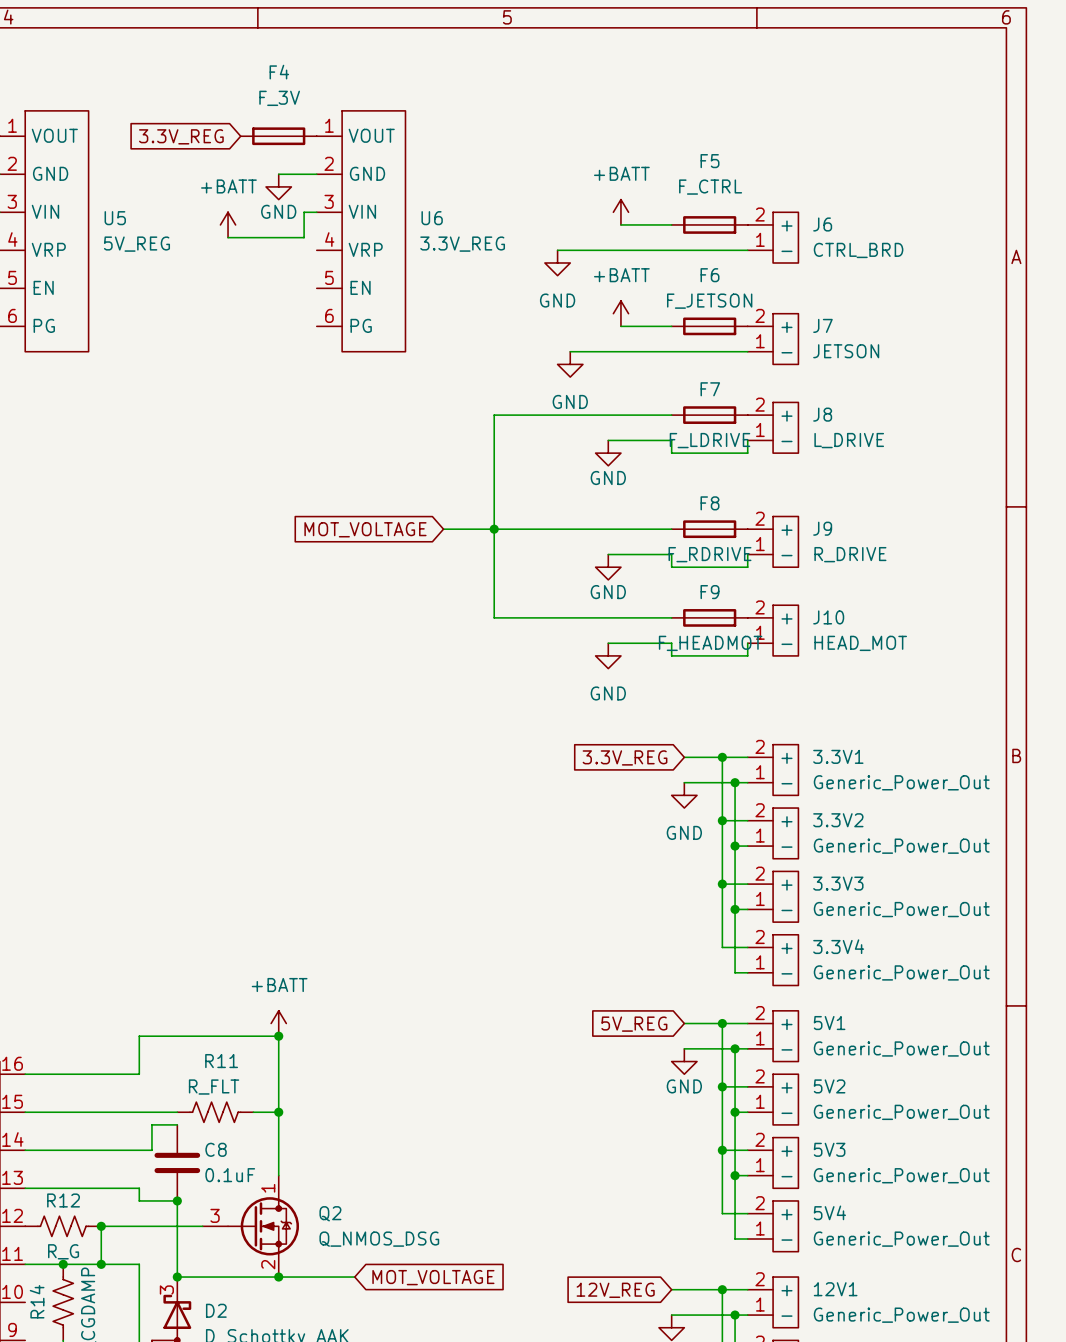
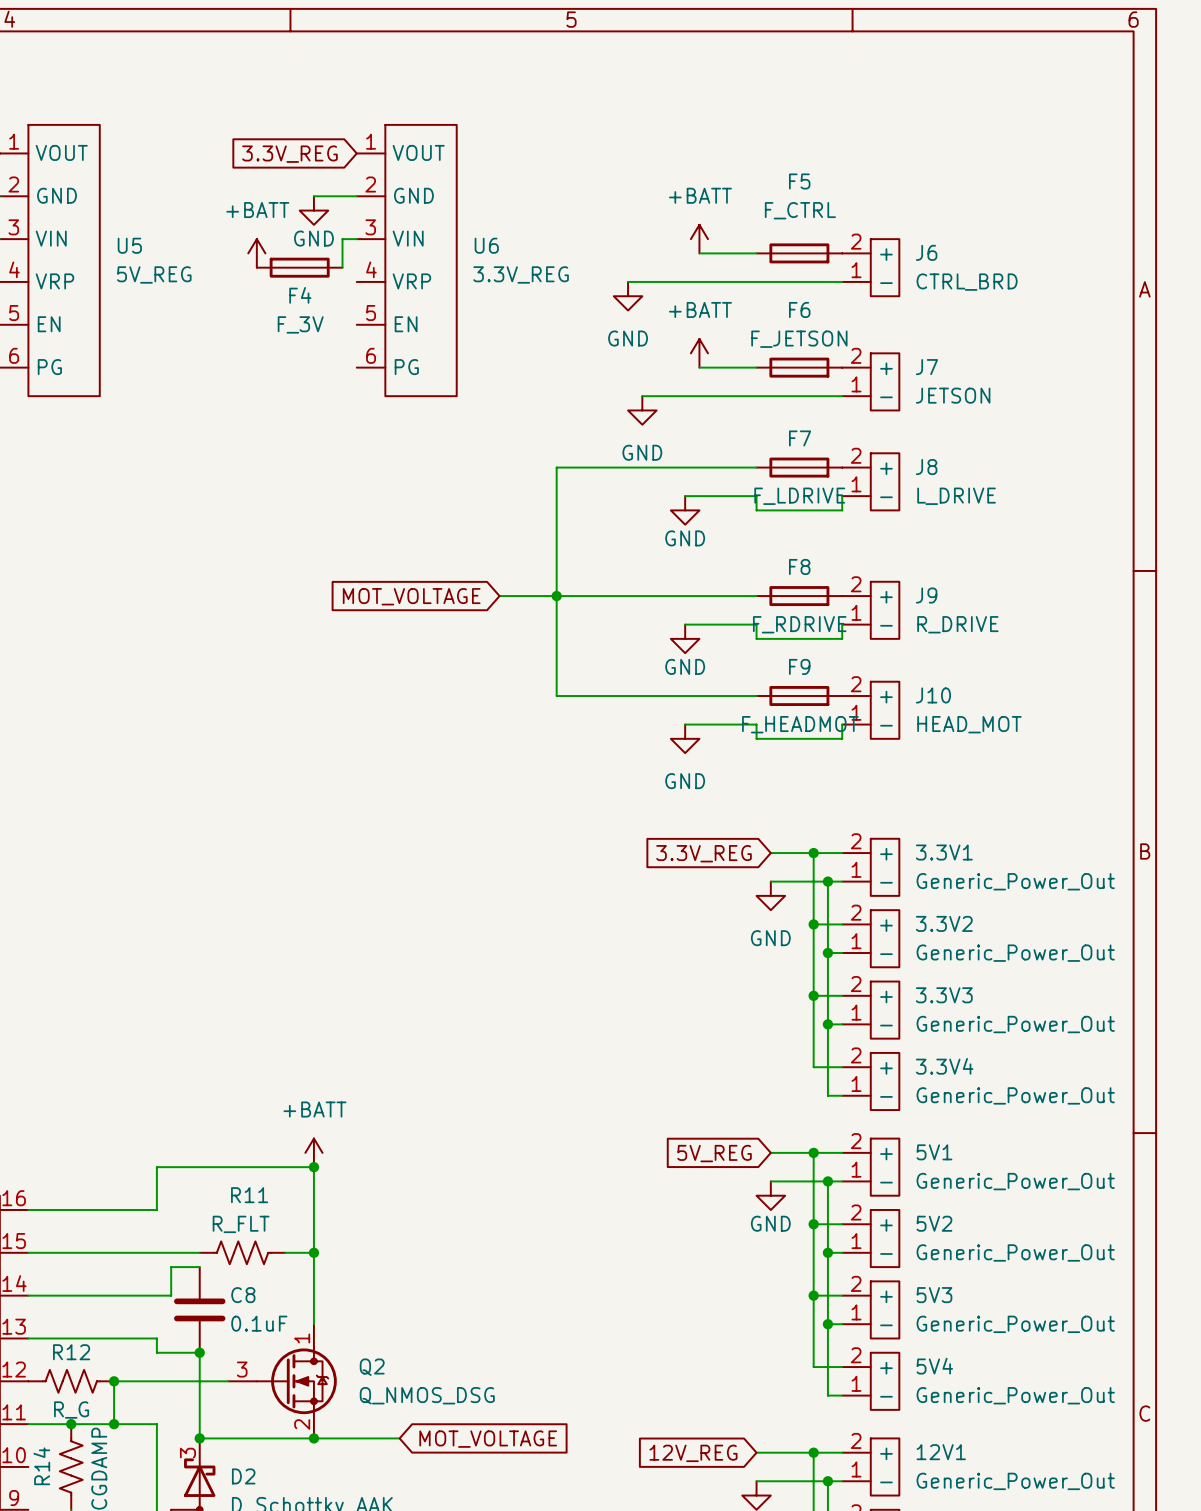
F4 name position: F4 (279, 72) -> F4 (300, 295)
F4 value position: F_3V (279, 98) -> F_3V (300, 324)
global label position: 3.3V_REG (181, 136) -> 3.3V_REG (289, 154)
F4 position: (278, 136) -> (299, 267)

